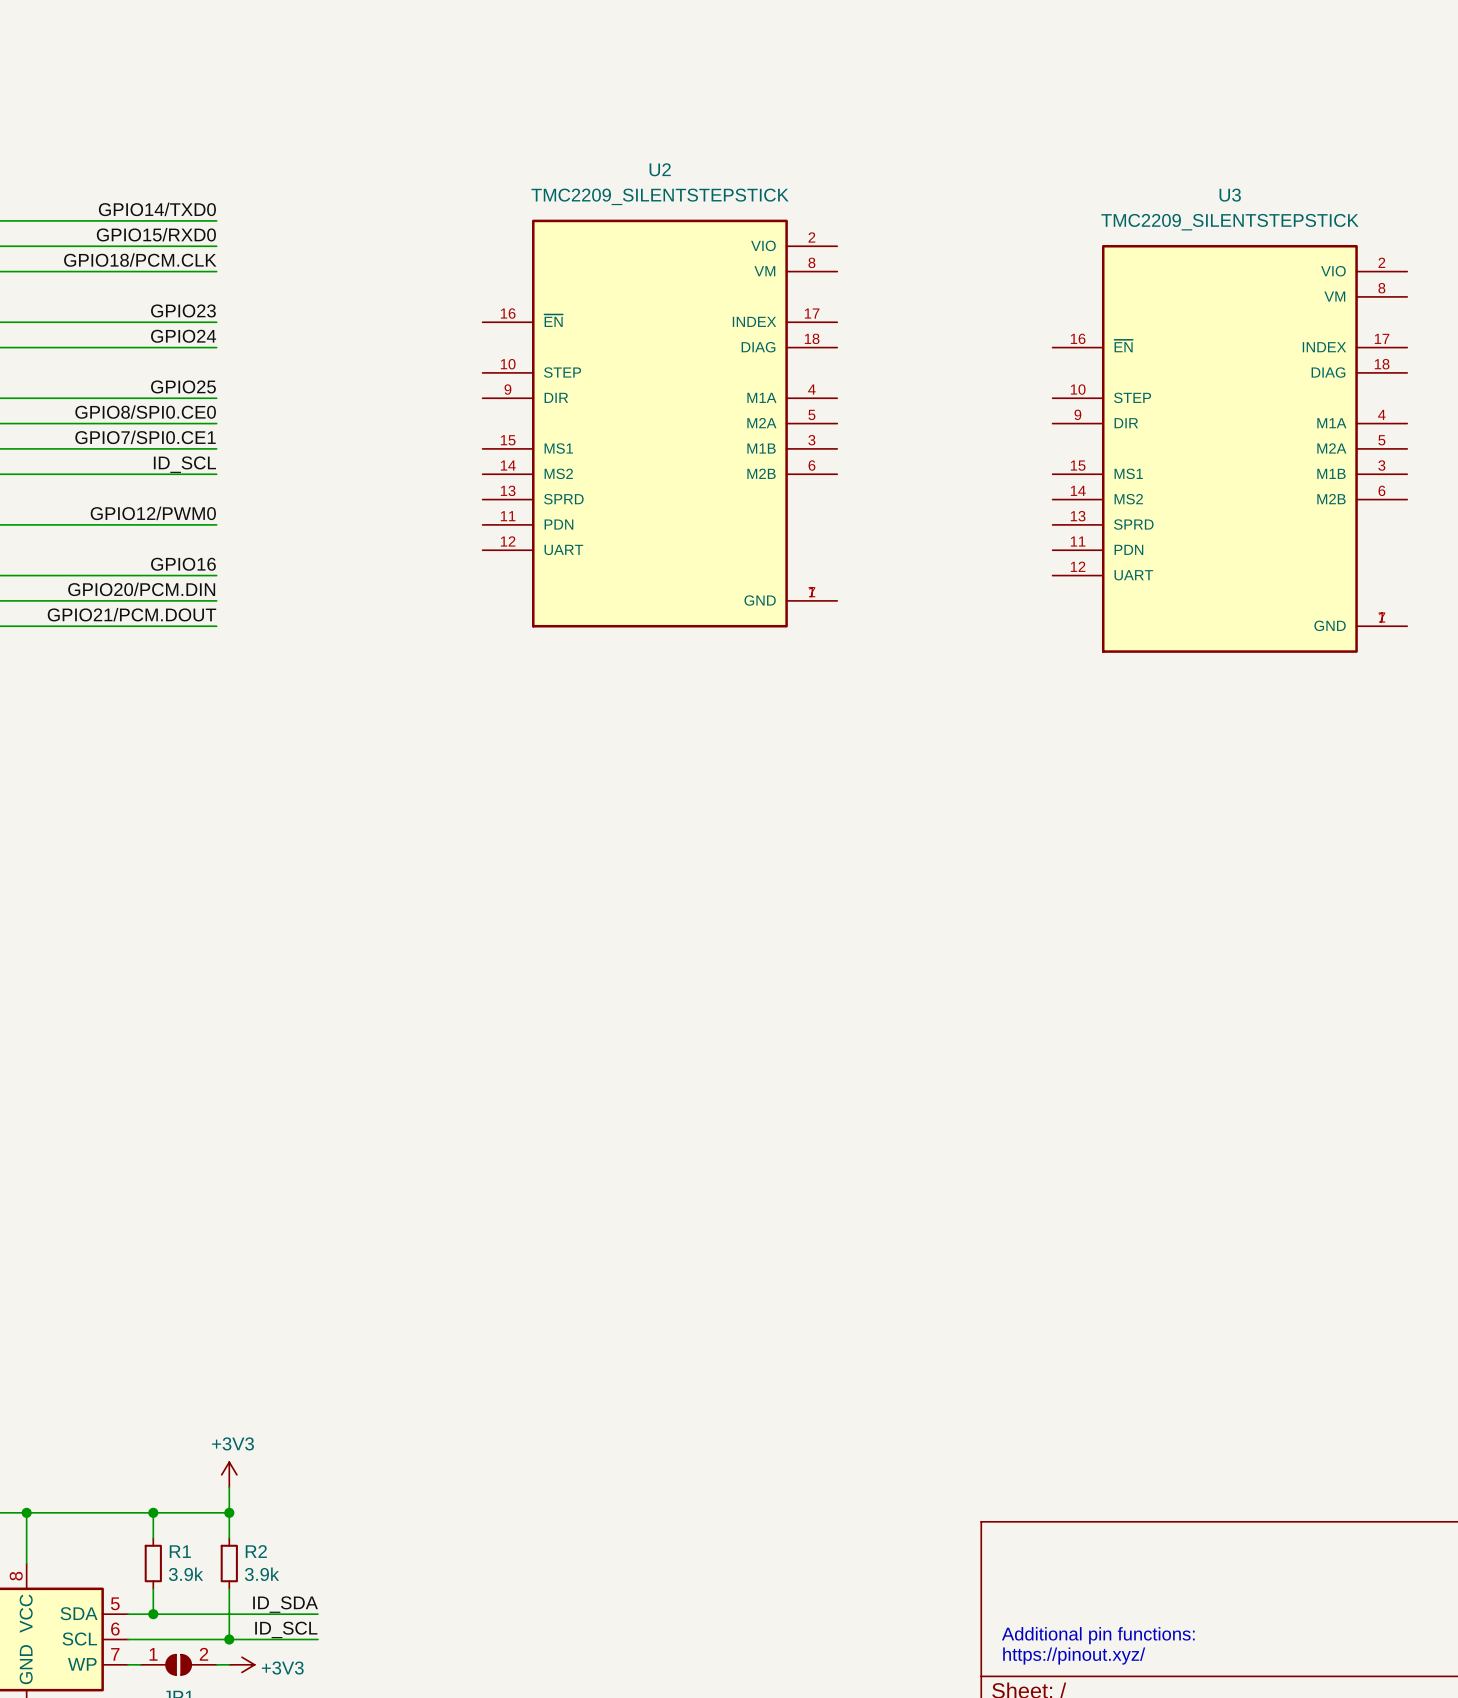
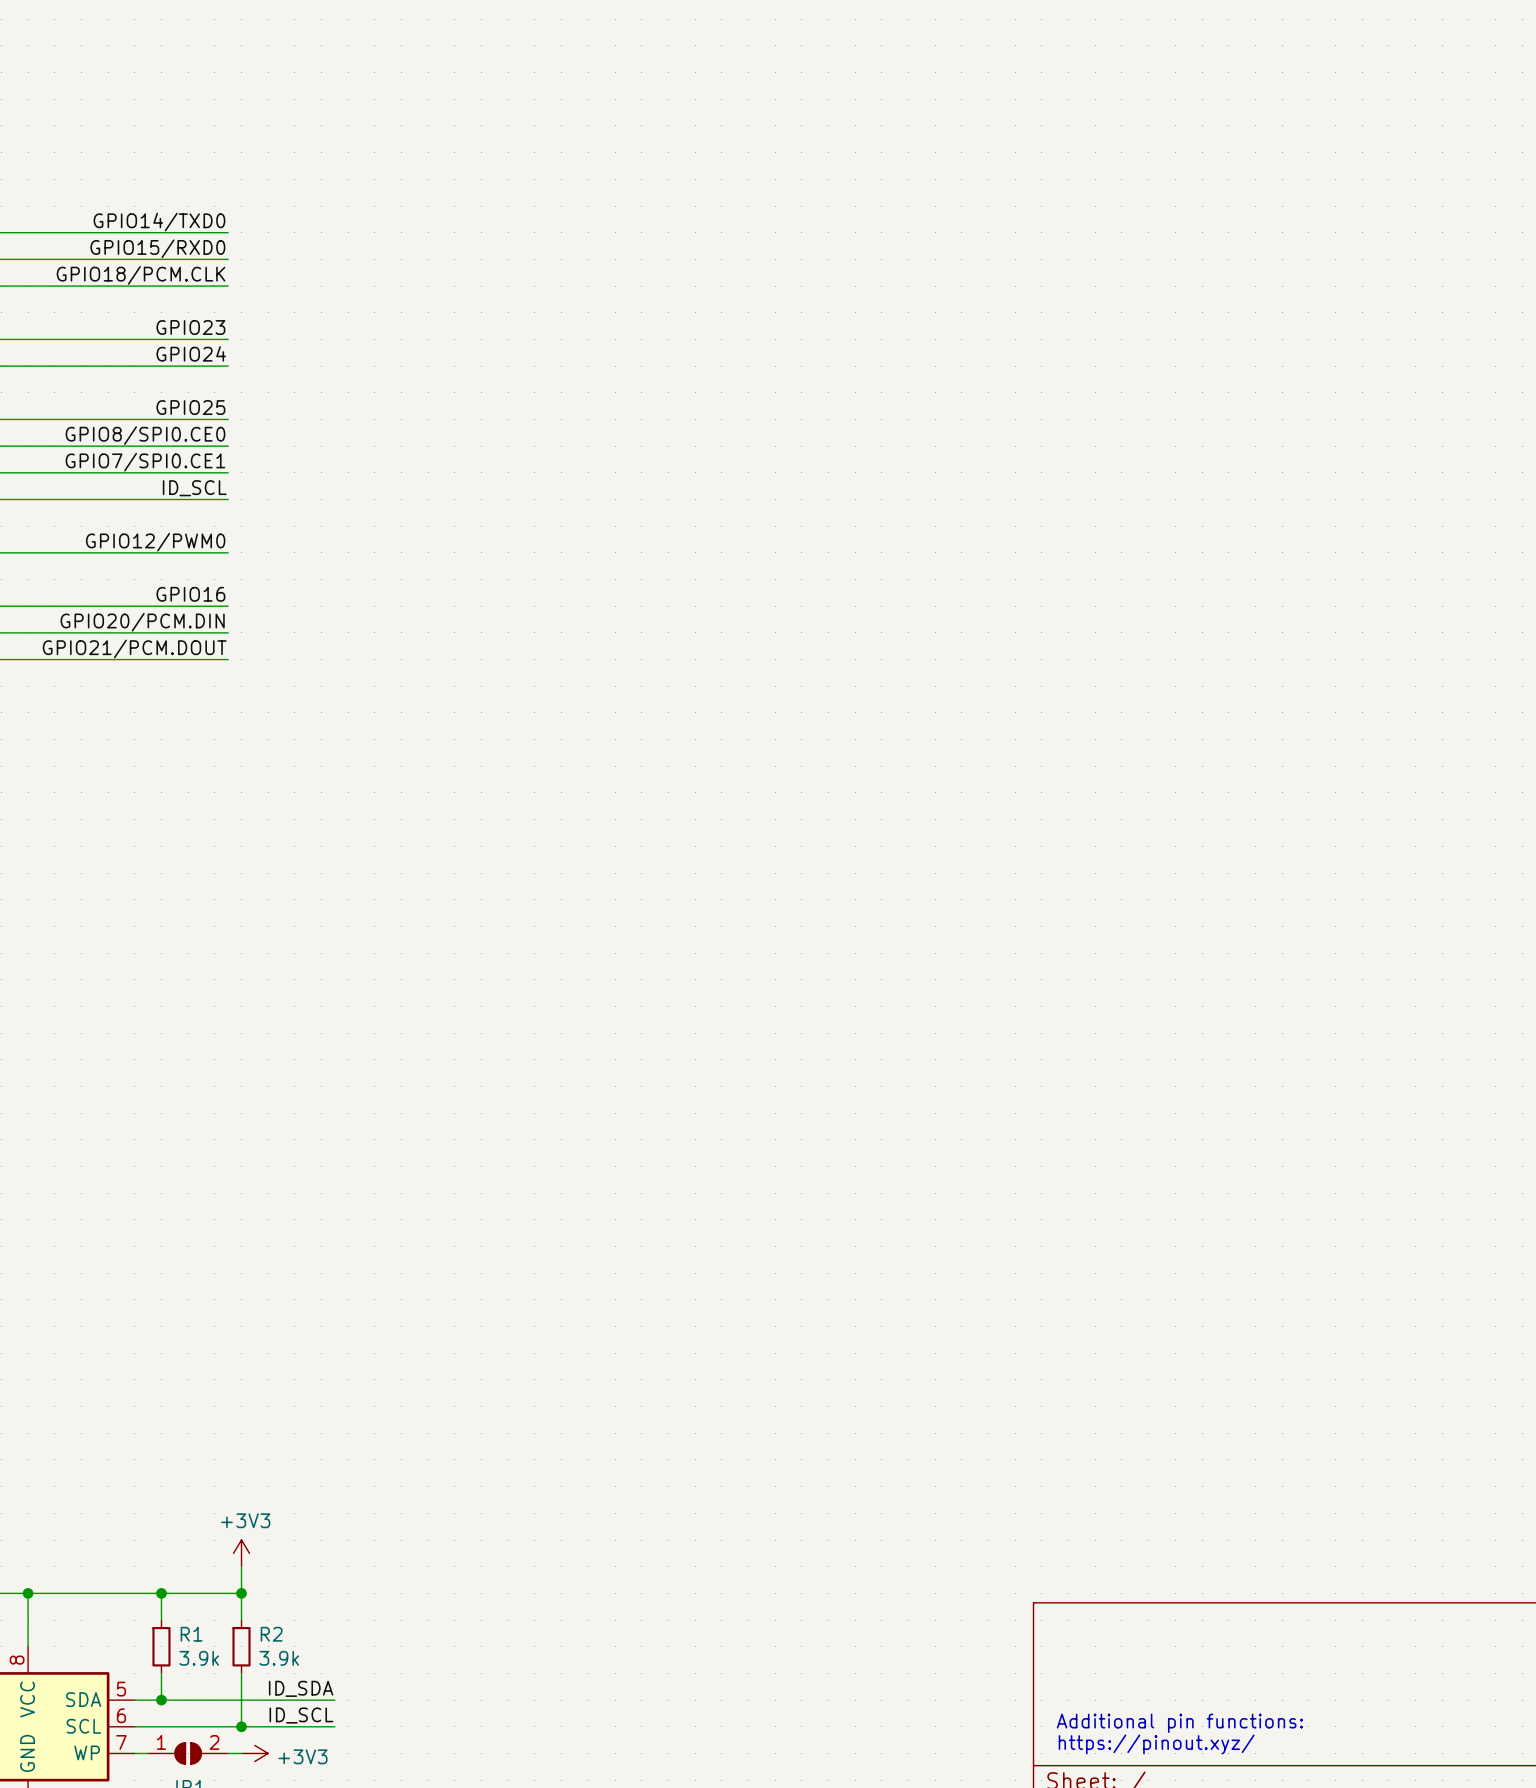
U2: TMC2209_SILENTSTEPSTICK (659, 423) -> none
U3: TMC2209_SILENTSTEPSTICK (1229, 448) -> none

